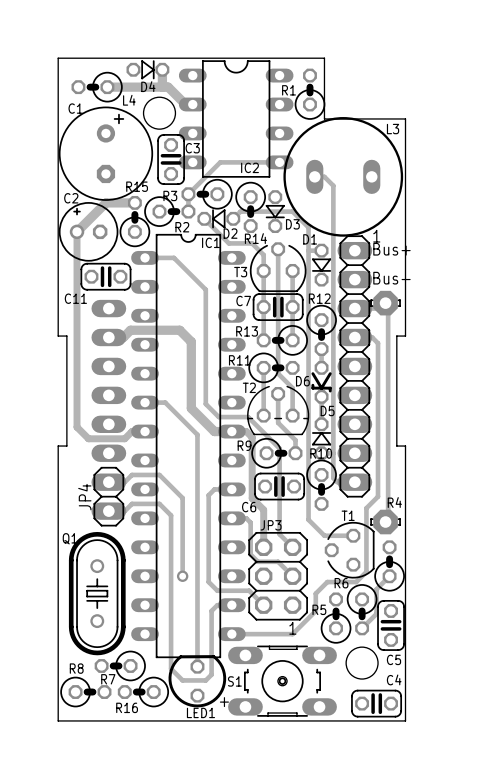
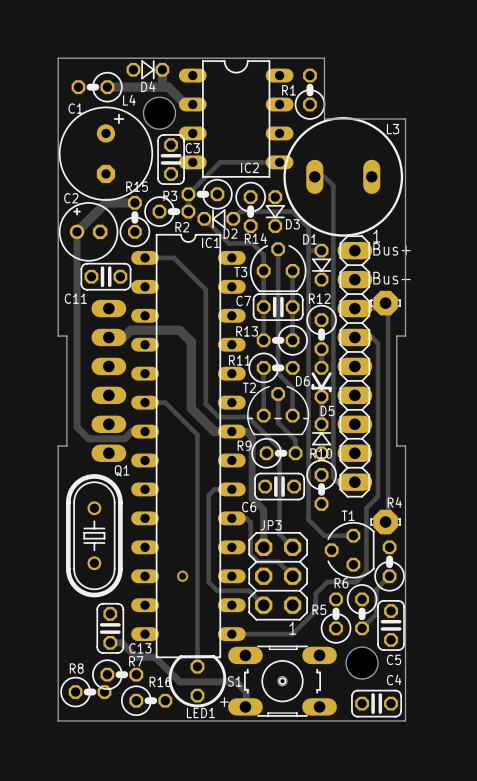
track: (108, 482) (124, 482) (132, 474) (159, 474) (182, 498) (182, 576) -> none
JP4: (108, 496) -> none
track: (108, 511) (124, 511) (132, 503) (159, 503) (171, 515) (171, 668) (182, 680) (205, 680) (211, 674) (211, 610) (217, 605) (231, 605) -> none
Q1 name position: Q1 (70, 538) -> Q1 (122, 470)
Q1 position: (97, 593) -> (94, 535)
C13: none -> (110, 628)
track: none -> (110, 642) (121, 642) (136, 657) (155, 657) (179, 681) (236, 681) (246, 692) (245, 706)
R7 rotation: 0° (120, 665) -> 180° (117, 674)
R16 rotation: 0° (143, 692) -> 180° (146, 700)

